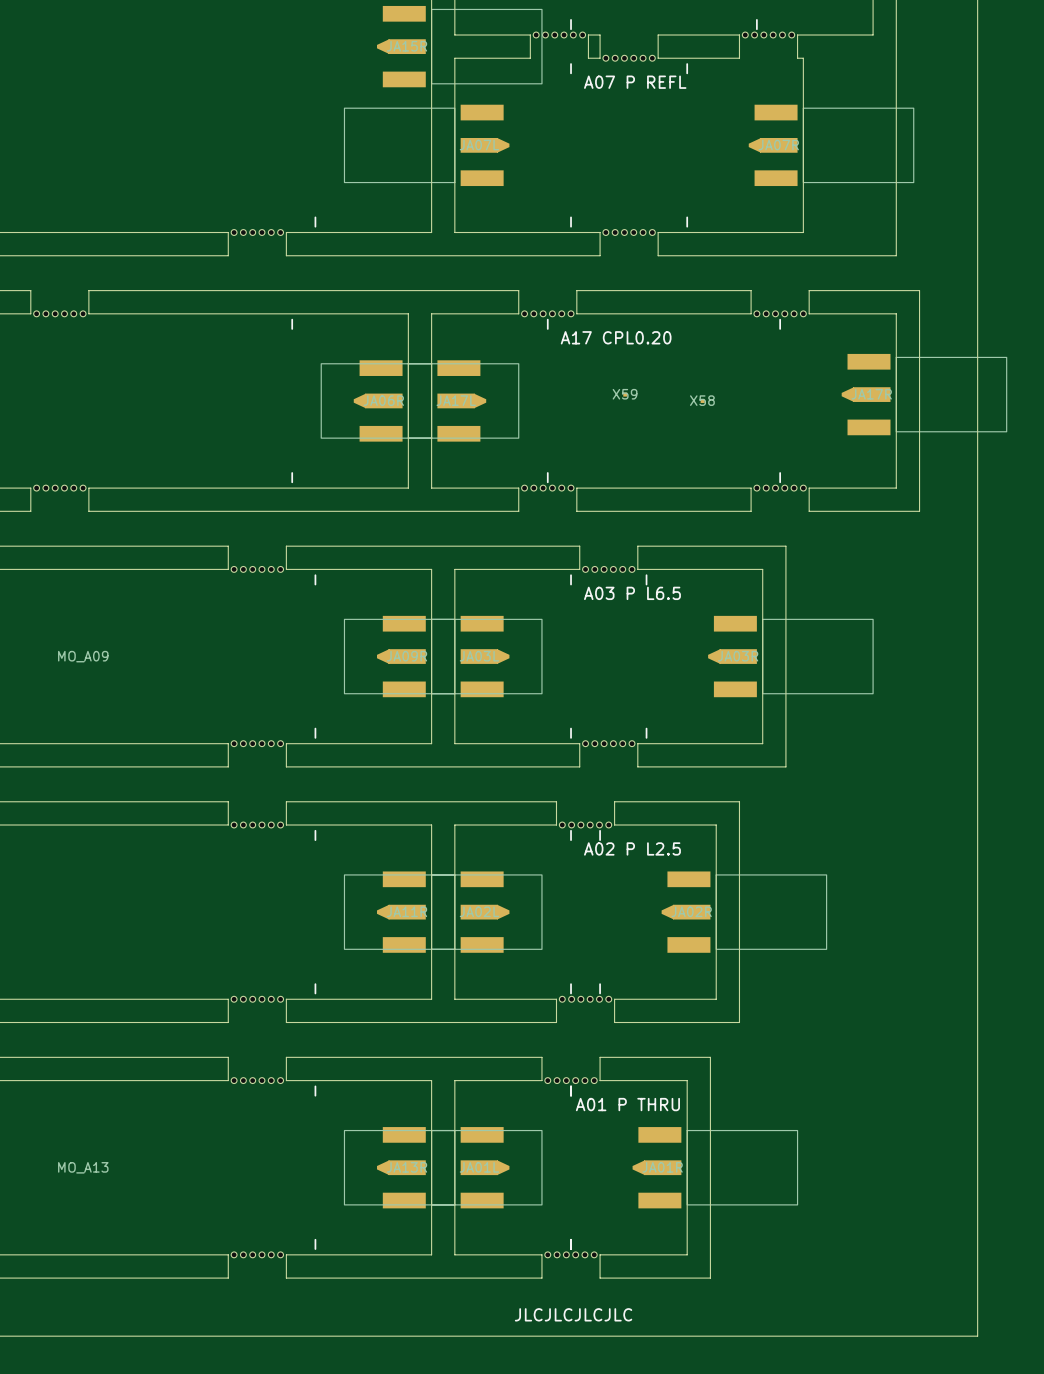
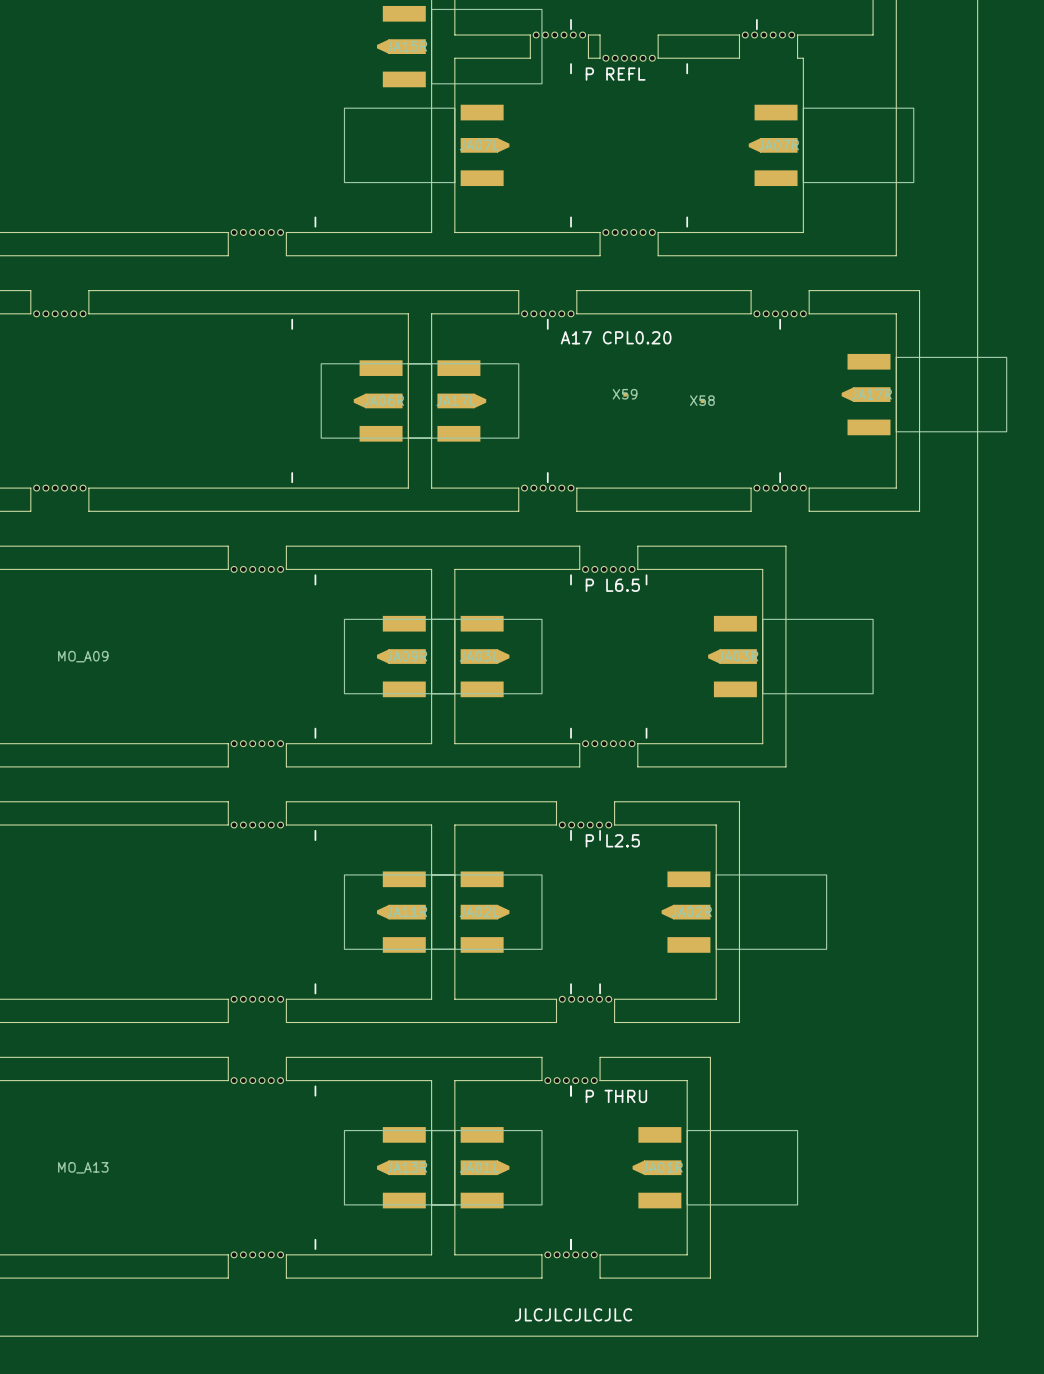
text: A07 P REFL (635, 82) -> P REFL (615, 74)
text: A03 P L6.5 (632, 593) -> P L6.5 (612, 585)
text: A02 P L2.5 (632, 848) -> P L2.5 (612, 840)
text: A01 P THRU (627, 1104) -> P THRU (616, 1096)

